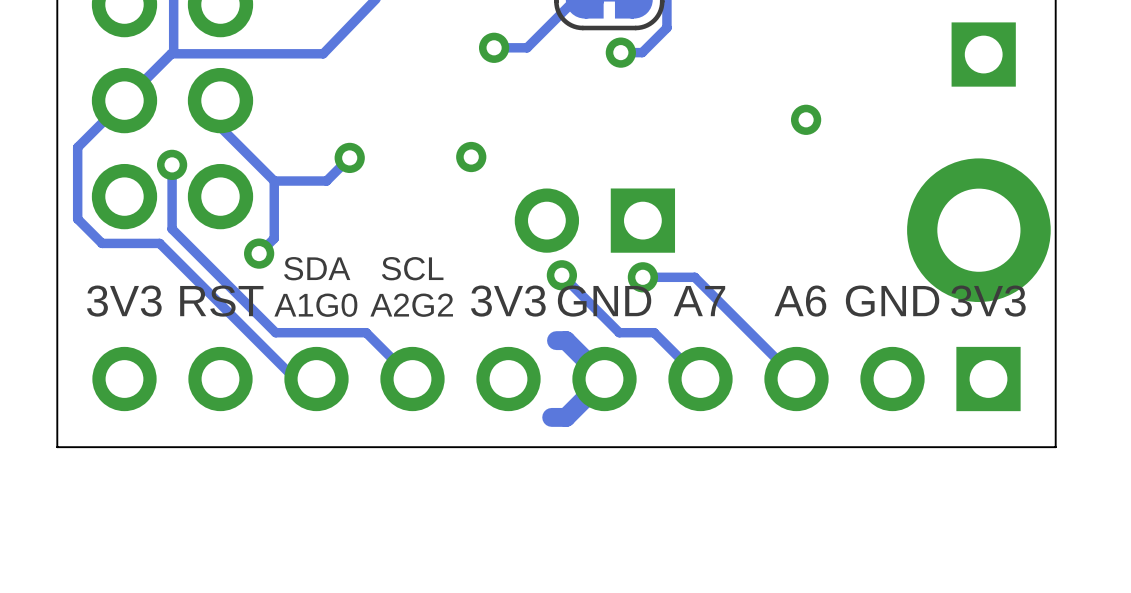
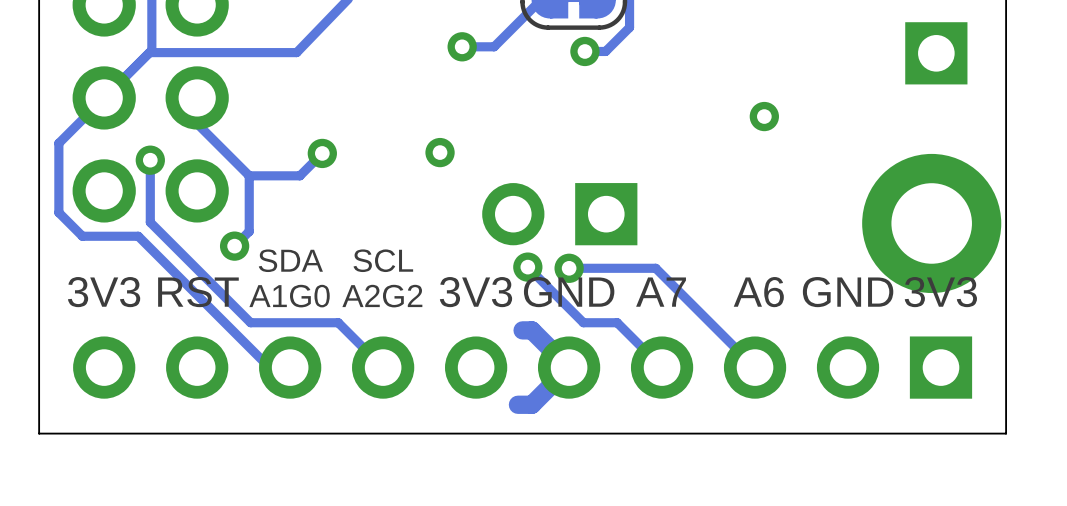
via position: (642, 277) -> (569, 268)
track: (694, 277) (642, 277) -> (656, 269) (569, 268)

